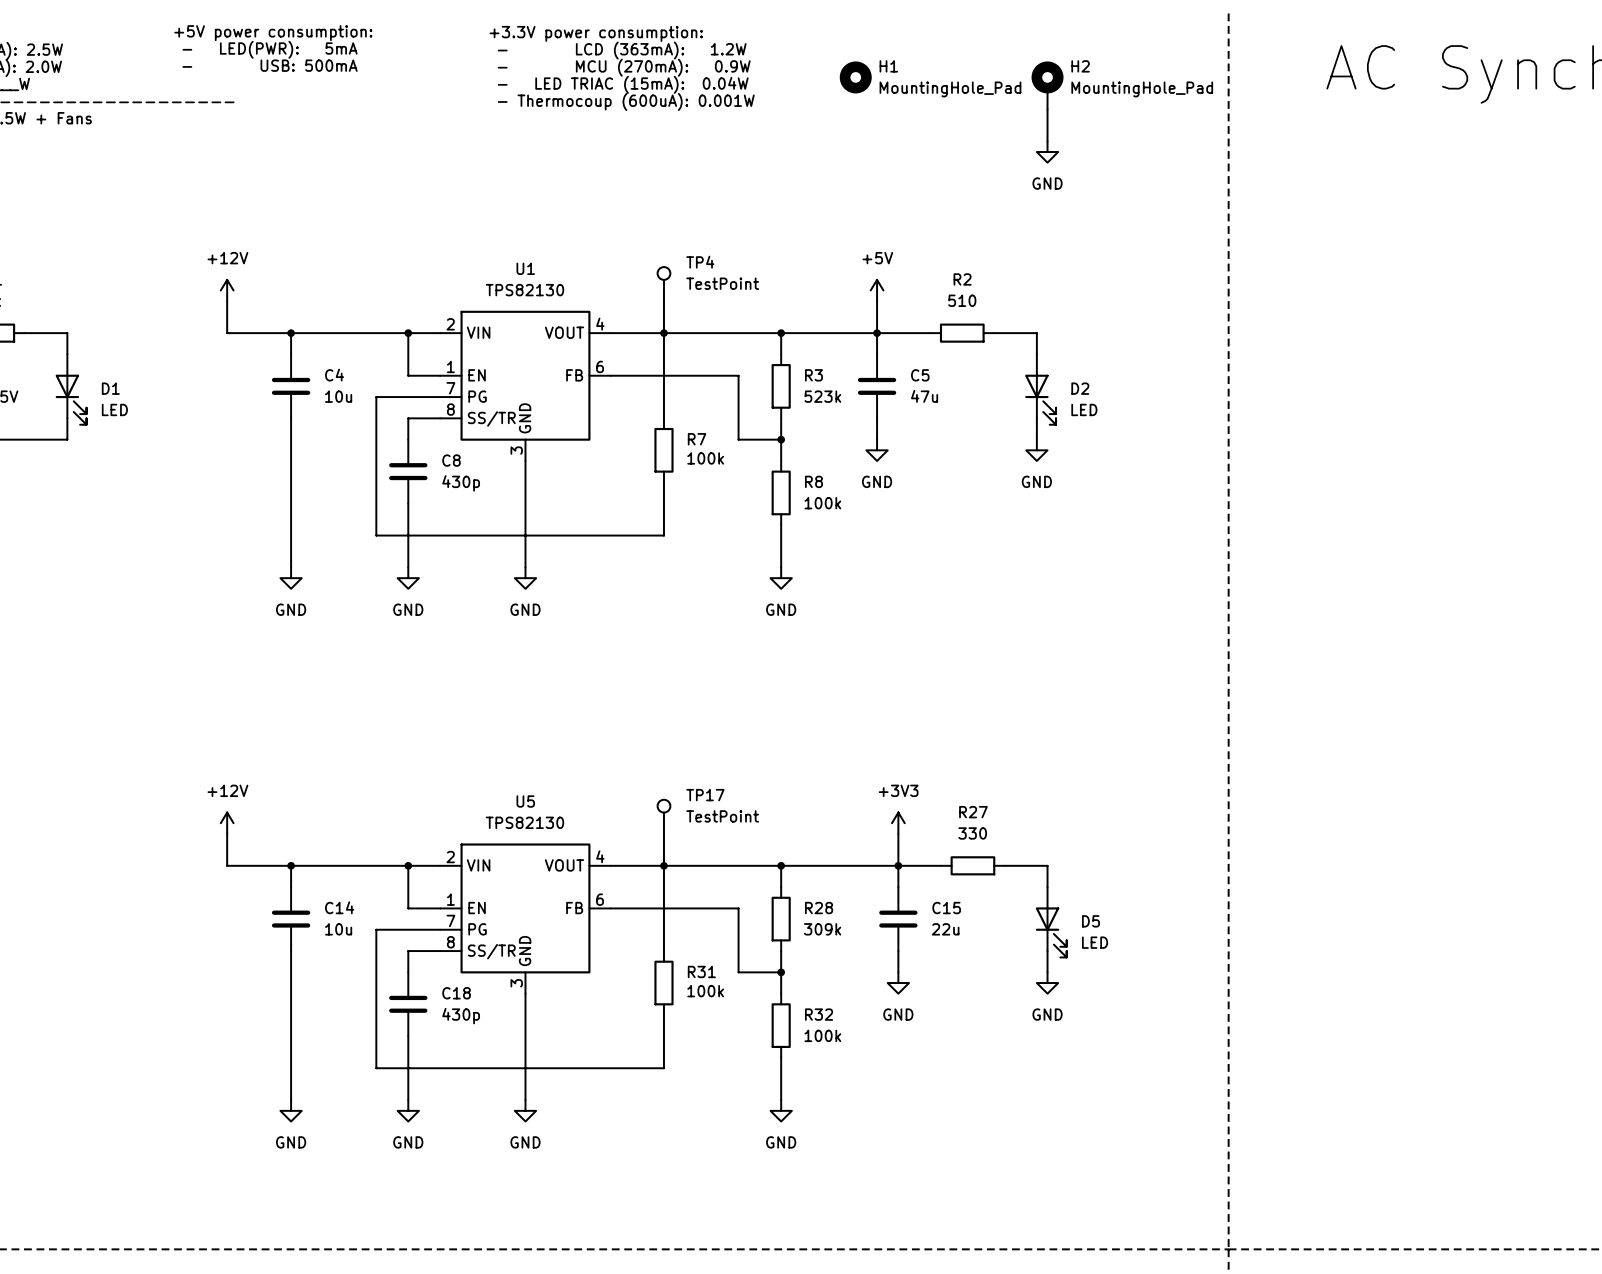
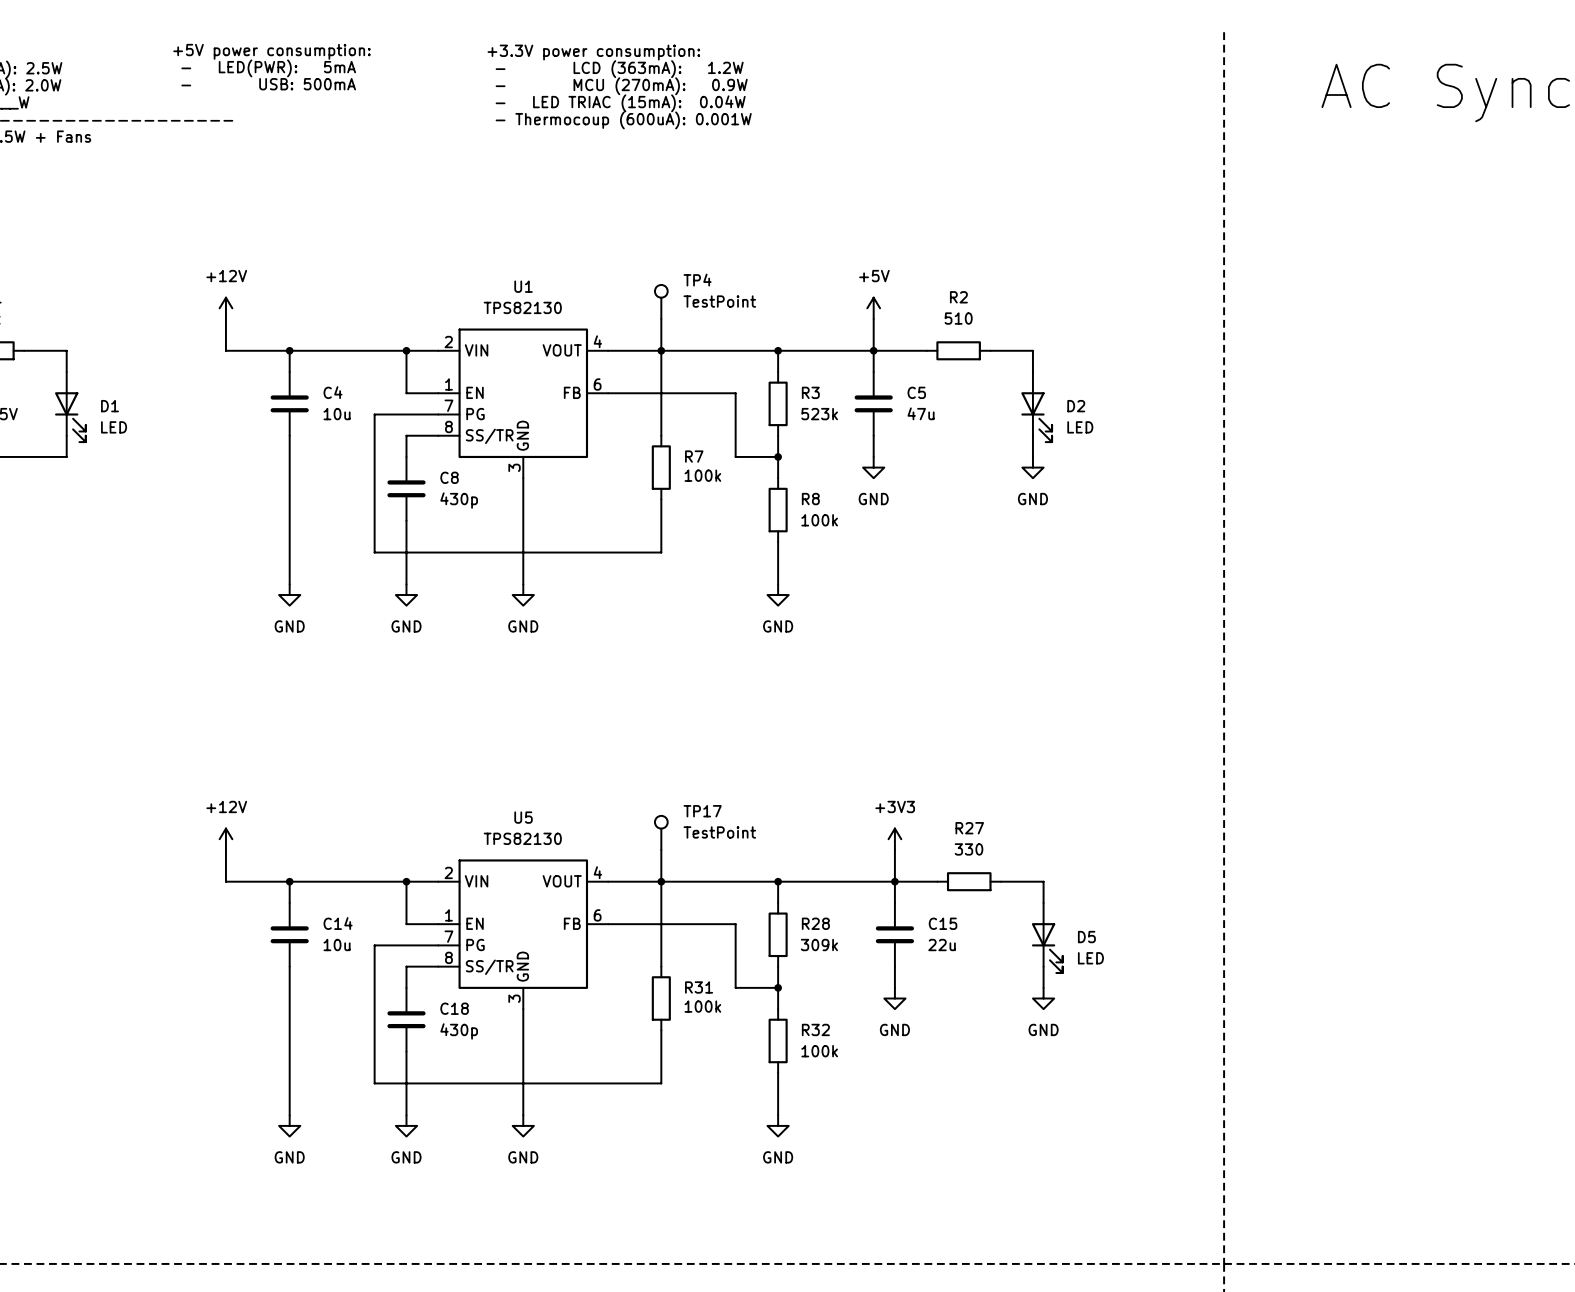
H1: MountingHole_Pad (855, 77) -> none
H2: MountingHole_Pad (1047, 85) -> none
wire: (1047, 109) (1047, 141) -> none
power symbol: GND (1047, 152) -> none

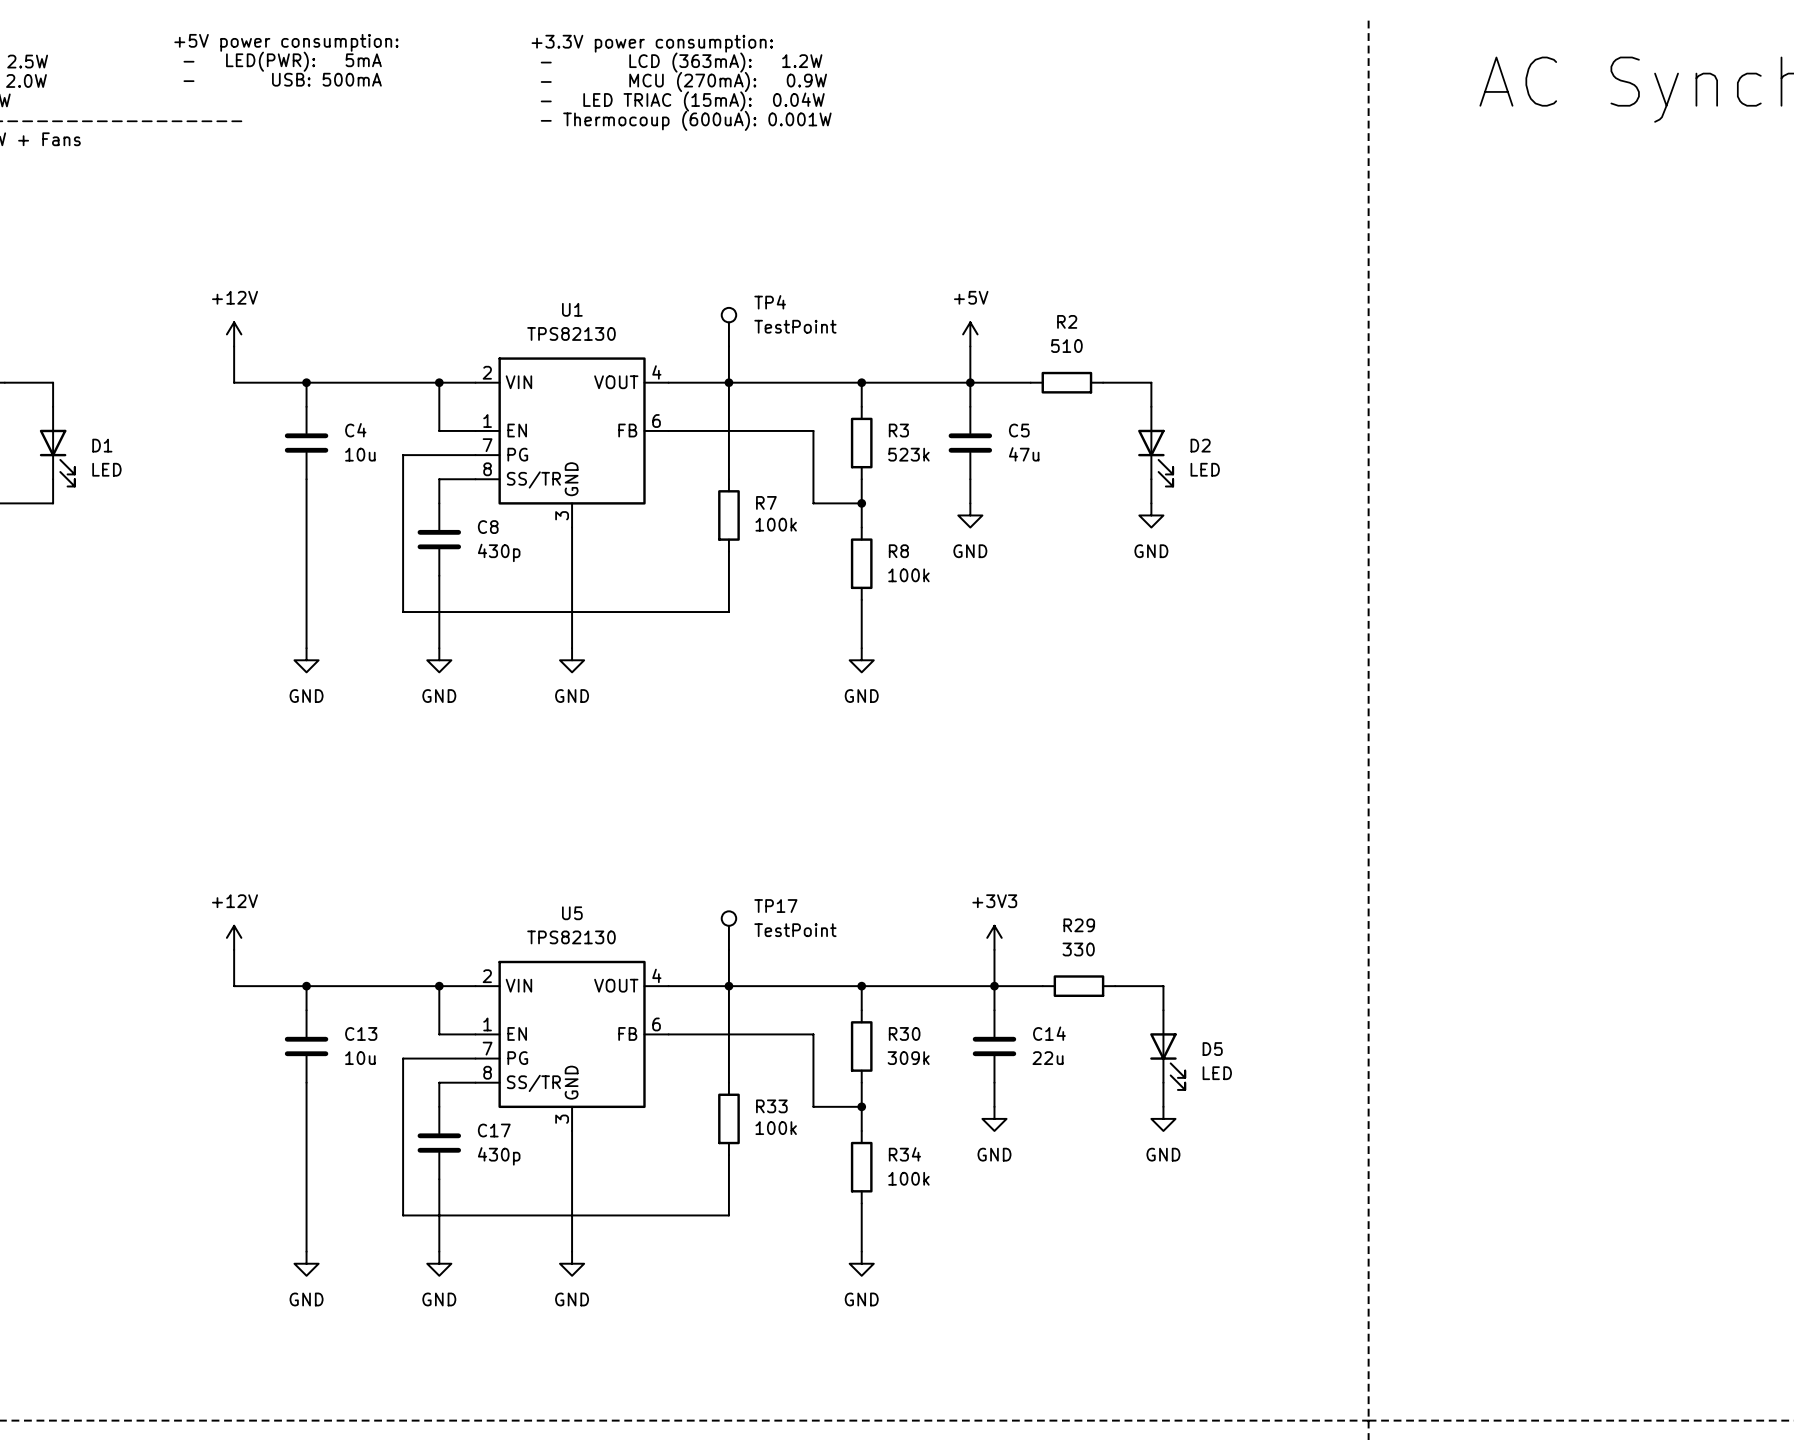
R27 name: R27 (969, 828) -> R29 (1079, 925)
C14 name: C14 (338, 923) -> C13 (361, 1033)
R28 name: R28 (815, 923) -> R30 (904, 1033)
C15 name: C15 (943, 923) -> C14 (1049, 1033)
R31 name: R31 (699, 987) -> R33 (771, 1106)
C18 name: C18 (454, 1008) -> C17 (494, 1130)
R32 name: R32 (815, 1029) -> R34 (904, 1154)

